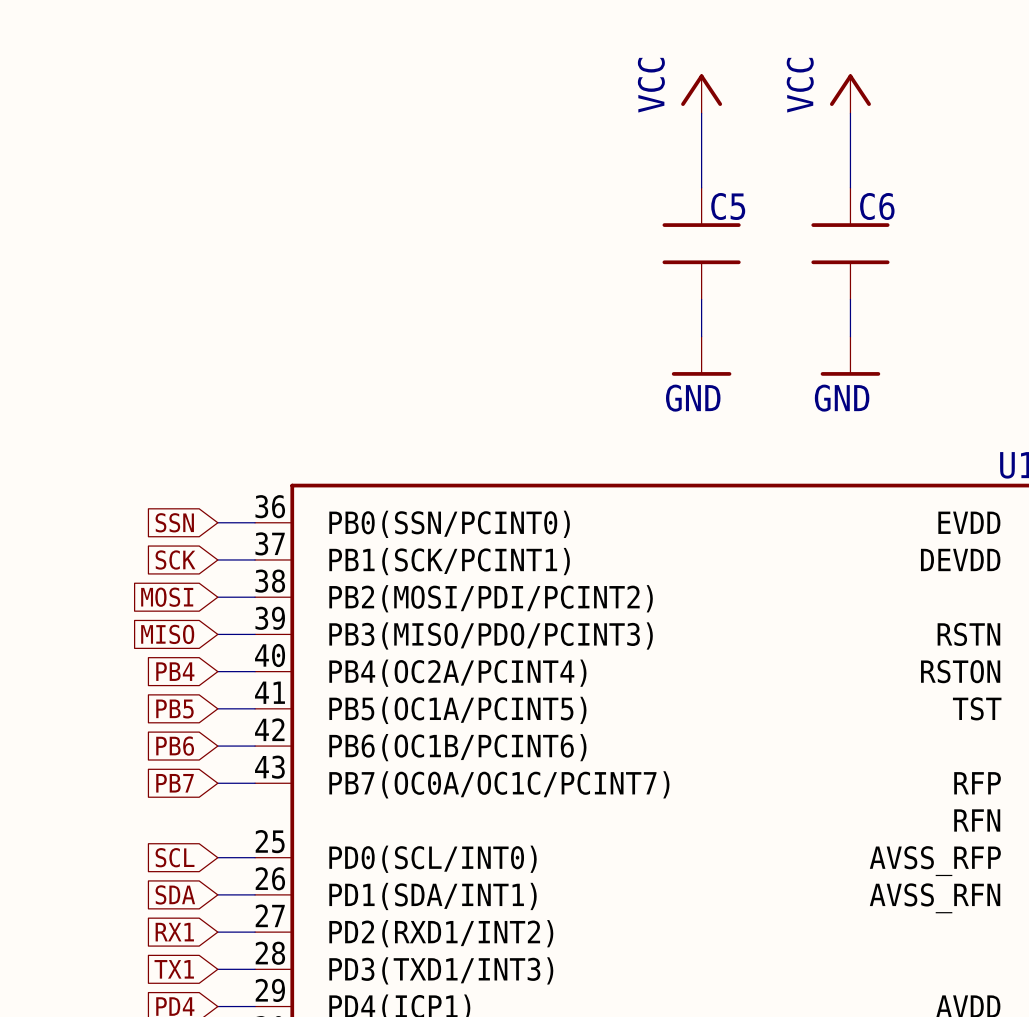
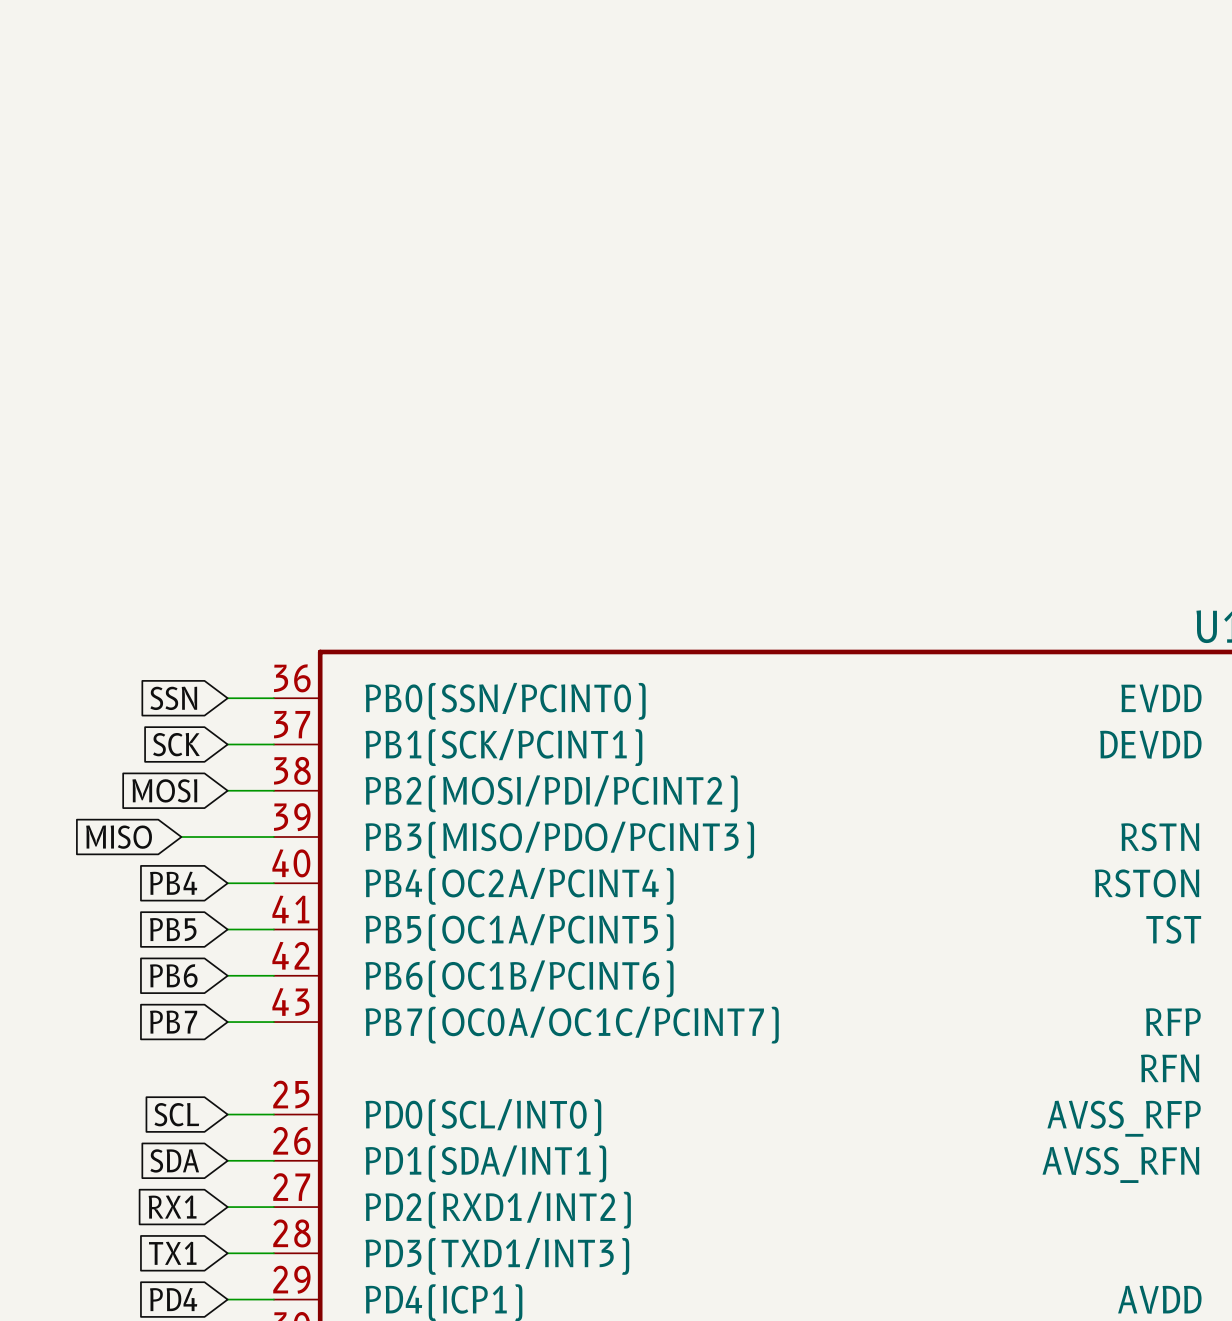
power symbol: VCC (701, 93) -> none
power symbol: VCC (850, 93) -> none
wire: (701, 113) (701, 187) -> none
wire: (850, 113) (850, 187) -> none
C5: (701, 243) -> none
C6: (850, 243) -> none
wire: (701, 299) (701, 336) -> none
wire: (850, 299) (850, 336) -> none
power symbol: GND (701, 356) -> none
power symbol: GND (850, 356) -> none
global label position: MISO (167, 634) -> MISO (119, 837)
wire: none -> (181, 837) (227, 837)

